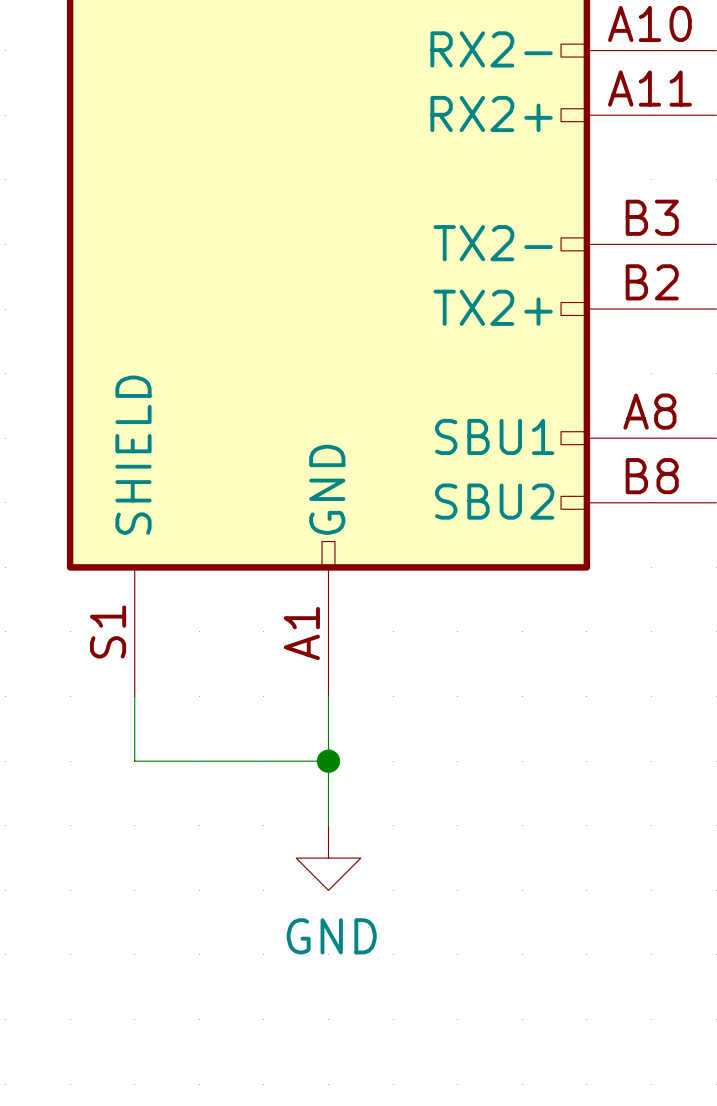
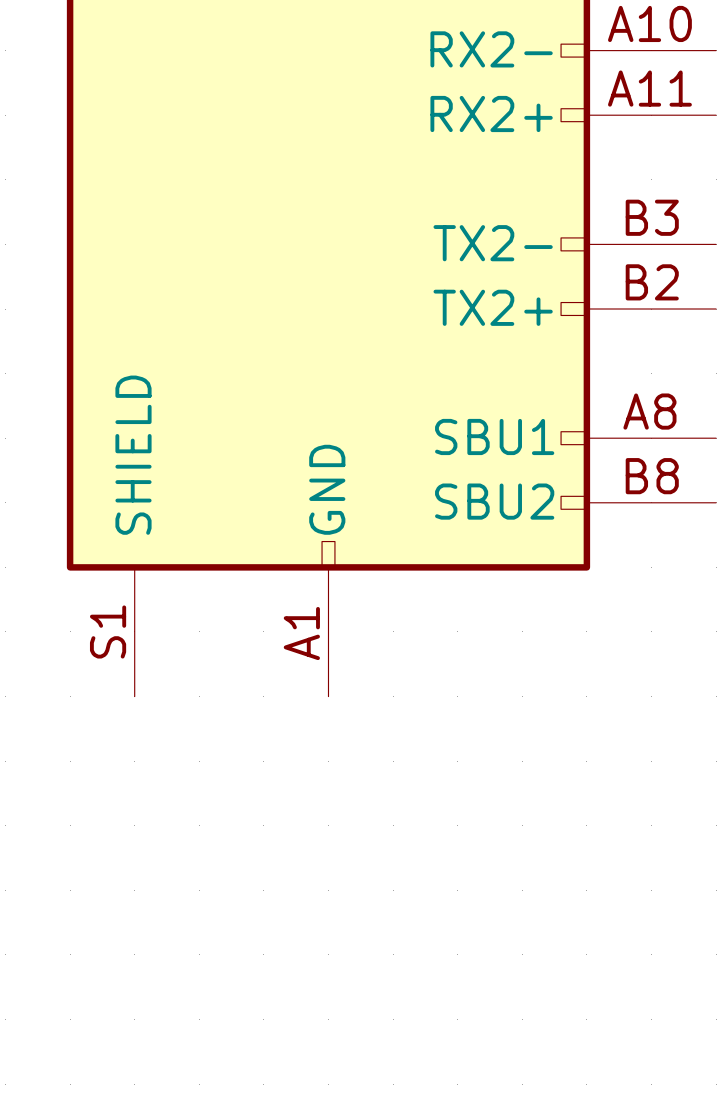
wire: (134, 696) (134, 761) (328, 761) -> none
wire: (328, 696) (328, 825) -> none
junction: (328, 761) -> none
power symbol: GND (328, 858) -> none

